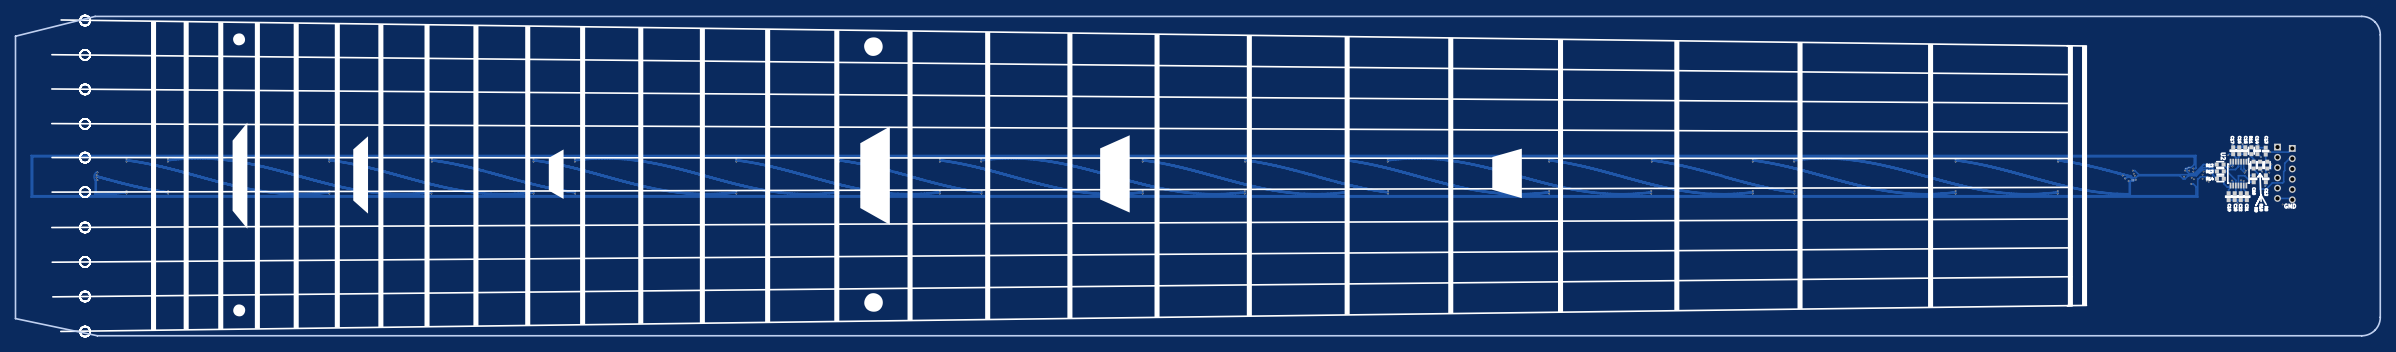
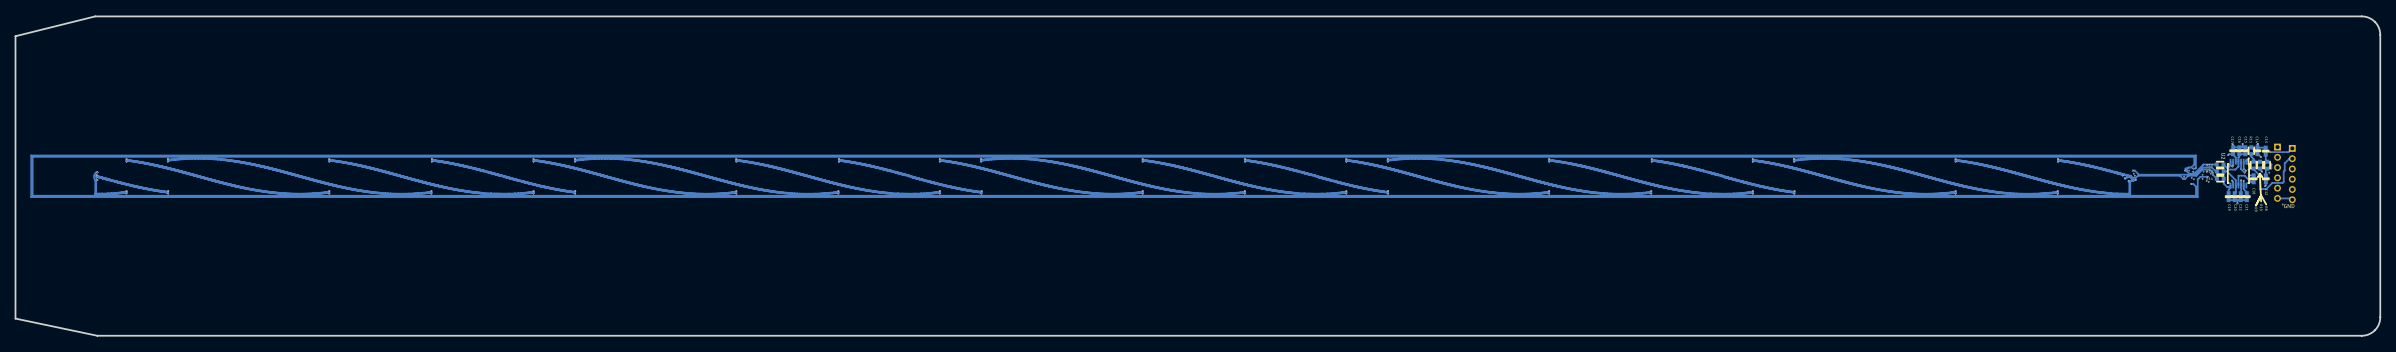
line: (85, 15) (90, 20) (84, 25) (79, 20) (85, 15) -> none
line: (61, 19) (2071, 45) -> none
drawing: [151, 21, 157, 331] -> none
drawing: [183, 21, 189, 330] -> none
drawing: [218, 22, 224, 330] -> none
drawing: [254, 22, 260, 329] -> none
drawing: [293, 23, 299, 329] -> none
drawing: [334, 23, 340, 328] -> none
drawing: [378, 24, 384, 328] -> none
drawing: [424, 24, 430, 327] -> none
drawing: [473, 25, 479, 326] -> none
drawing: [525, 26, 531, 326] -> none
drawing: [580, 26, 586, 325] -> none
drawing: [638, 27, 644, 324] -> none
drawing: [699, 28, 705, 324] -> none
drawing: [765, 29, 771, 323] -> none
drawing: [834, 29, 840, 322] -> none
drawing: [907, 30, 913, 321] -> none
drawing: [985, 31, 991, 320] -> none
drawing: [1067, 32, 1073, 319] -> none
drawing: [233, 33, 246, 46] -> none
drawing: [1154, 34, 1160, 318] -> none
drawing: [1246, 35, 1252, 317] -> none
drawing: [1344, 36, 1350, 315] -> none
drawing: [864, 37, 883, 56] -> none
drawing: [1448, 37, 1454, 314] -> none
drawing: [1557, 39, 1564, 313] -> none
drawing: [1674, 40, 1680, 311] -> none
drawing: [1797, 42, 1803, 310] -> none
drawing: [1928, 43, 1934, 308] -> none
line: (2067, 45) (2086, 45) -> none
drawing: [2067, 45, 2073, 306] -> none
drawing: [2082, 45, 2088, 306] -> none
line: (85, 49) (90, 54) (85, 59) (79, 54) (85, 49) -> none
line: (51, 54) (2071, 74) -> none
line: (85, 84) (90, 89) (84, 94) (79, 89) (85, 84) -> none
line: (51, 88) (2071, 103) -> none
line: (85, 118) (90, 124) (84, 128) (80, 123) (85, 118) -> none
drawing: [232, 122, 248, 229] -> none
line: (51, 123) (2071, 132) -> none
drawing: [860, 126, 890, 225] -> none
drawing: [1100, 135, 1130, 213] -> none
drawing: [353, 136, 369, 214] -> none
drawing: [1492, 148, 1522, 199] -> none
drawing: [548, 149, 564, 199] -> none
line: (85, 152) (90, 157) (84, 162) (79, 157) (85, 152) -> none
line: (52, 157) (2071, 158) -> none
line: (85, 187) (90, 192) (84, 197) (80, 191) (85, 187) -> none
line: (2071, 187) (52, 192) -> none
line: (2071, 218) (51, 227) -> none
line: (85, 222) (90, 227) (84, 232) (80, 226) (85, 222) -> none
line: (2071, 247) (52, 262) -> none
line: (85, 256) (90, 262) (84, 267) (79, 261) (85, 256) -> none
line: (2071, 276) (52, 296) -> none
line: (85, 291) (90, 296) (84, 301) (79, 296) (85, 291) -> none
drawing: [864, 293, 883, 312] -> none
drawing: [233, 304, 246, 317] -> none
line: (2072, 305) (60, 331) -> none
line: (2086, 305) (2067, 305) -> none
line: (85, 326) (90, 332) (84, 336) (80, 331) (85, 326) -> none

